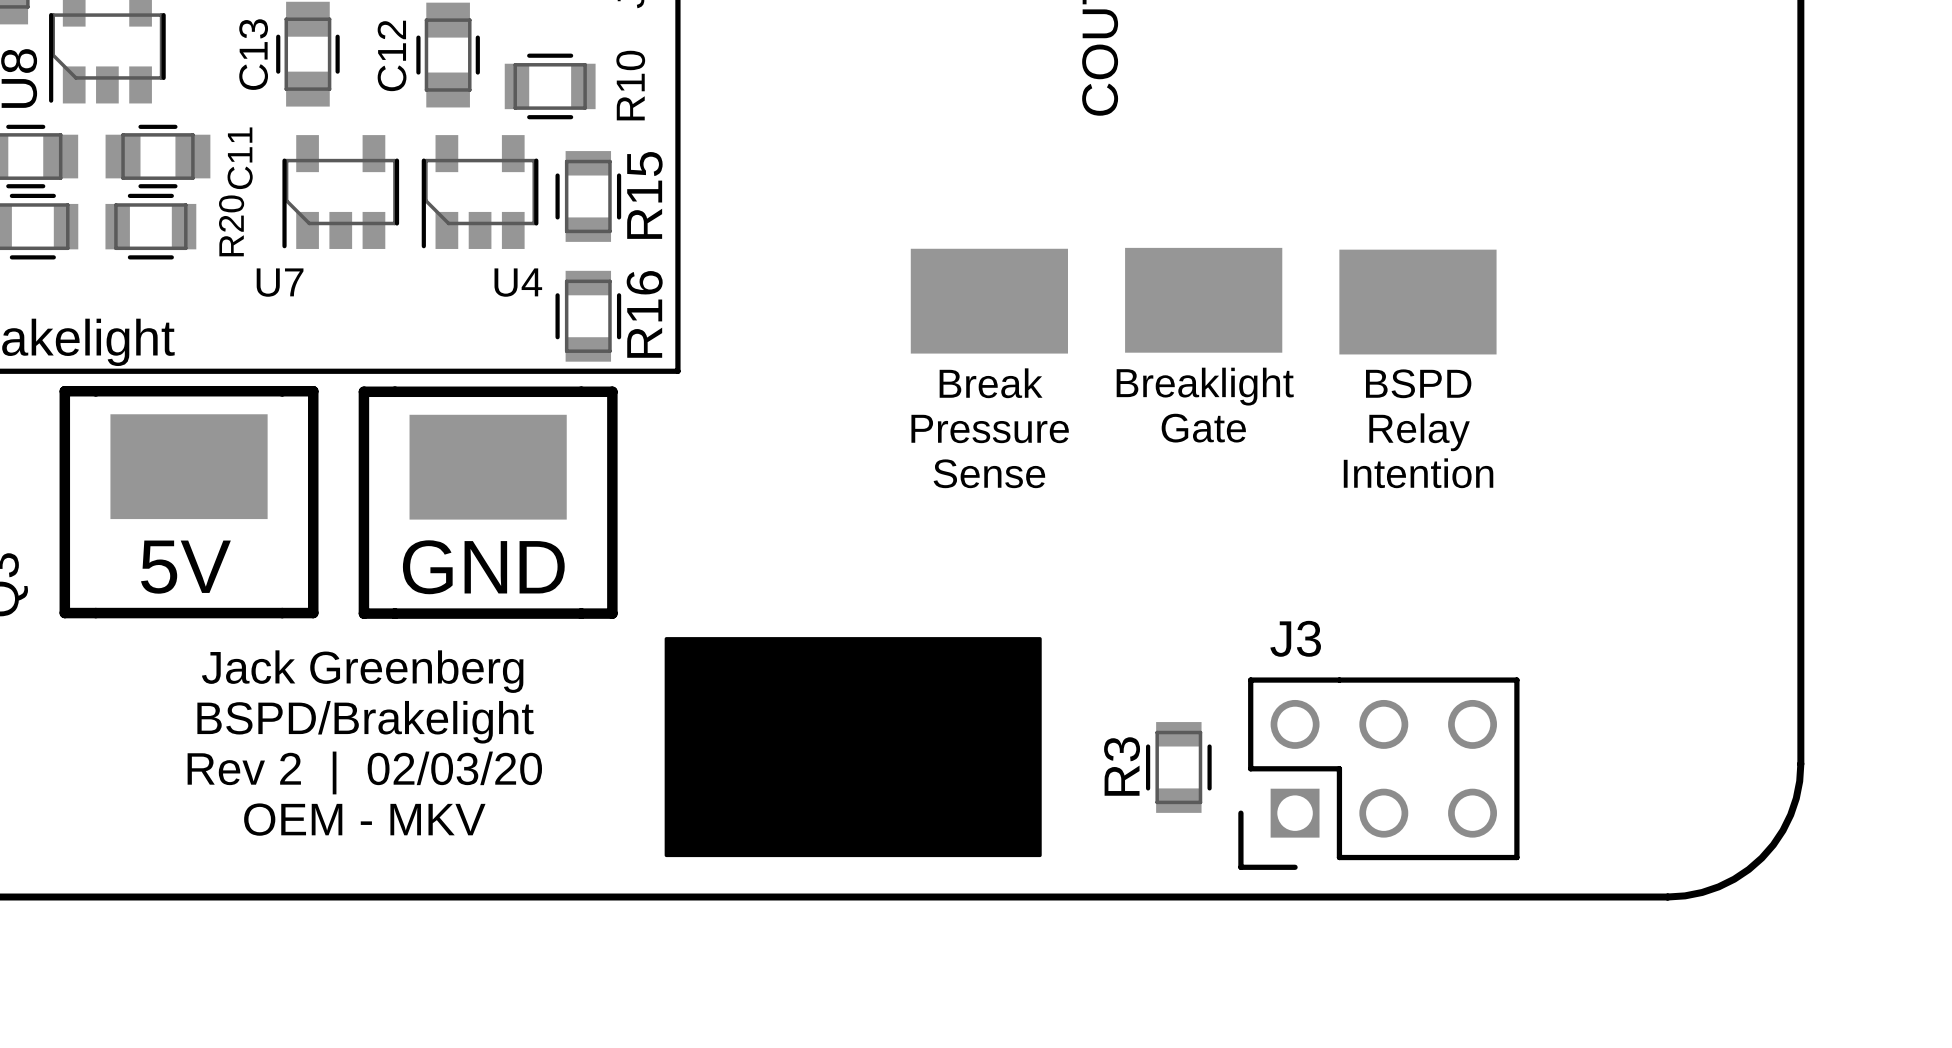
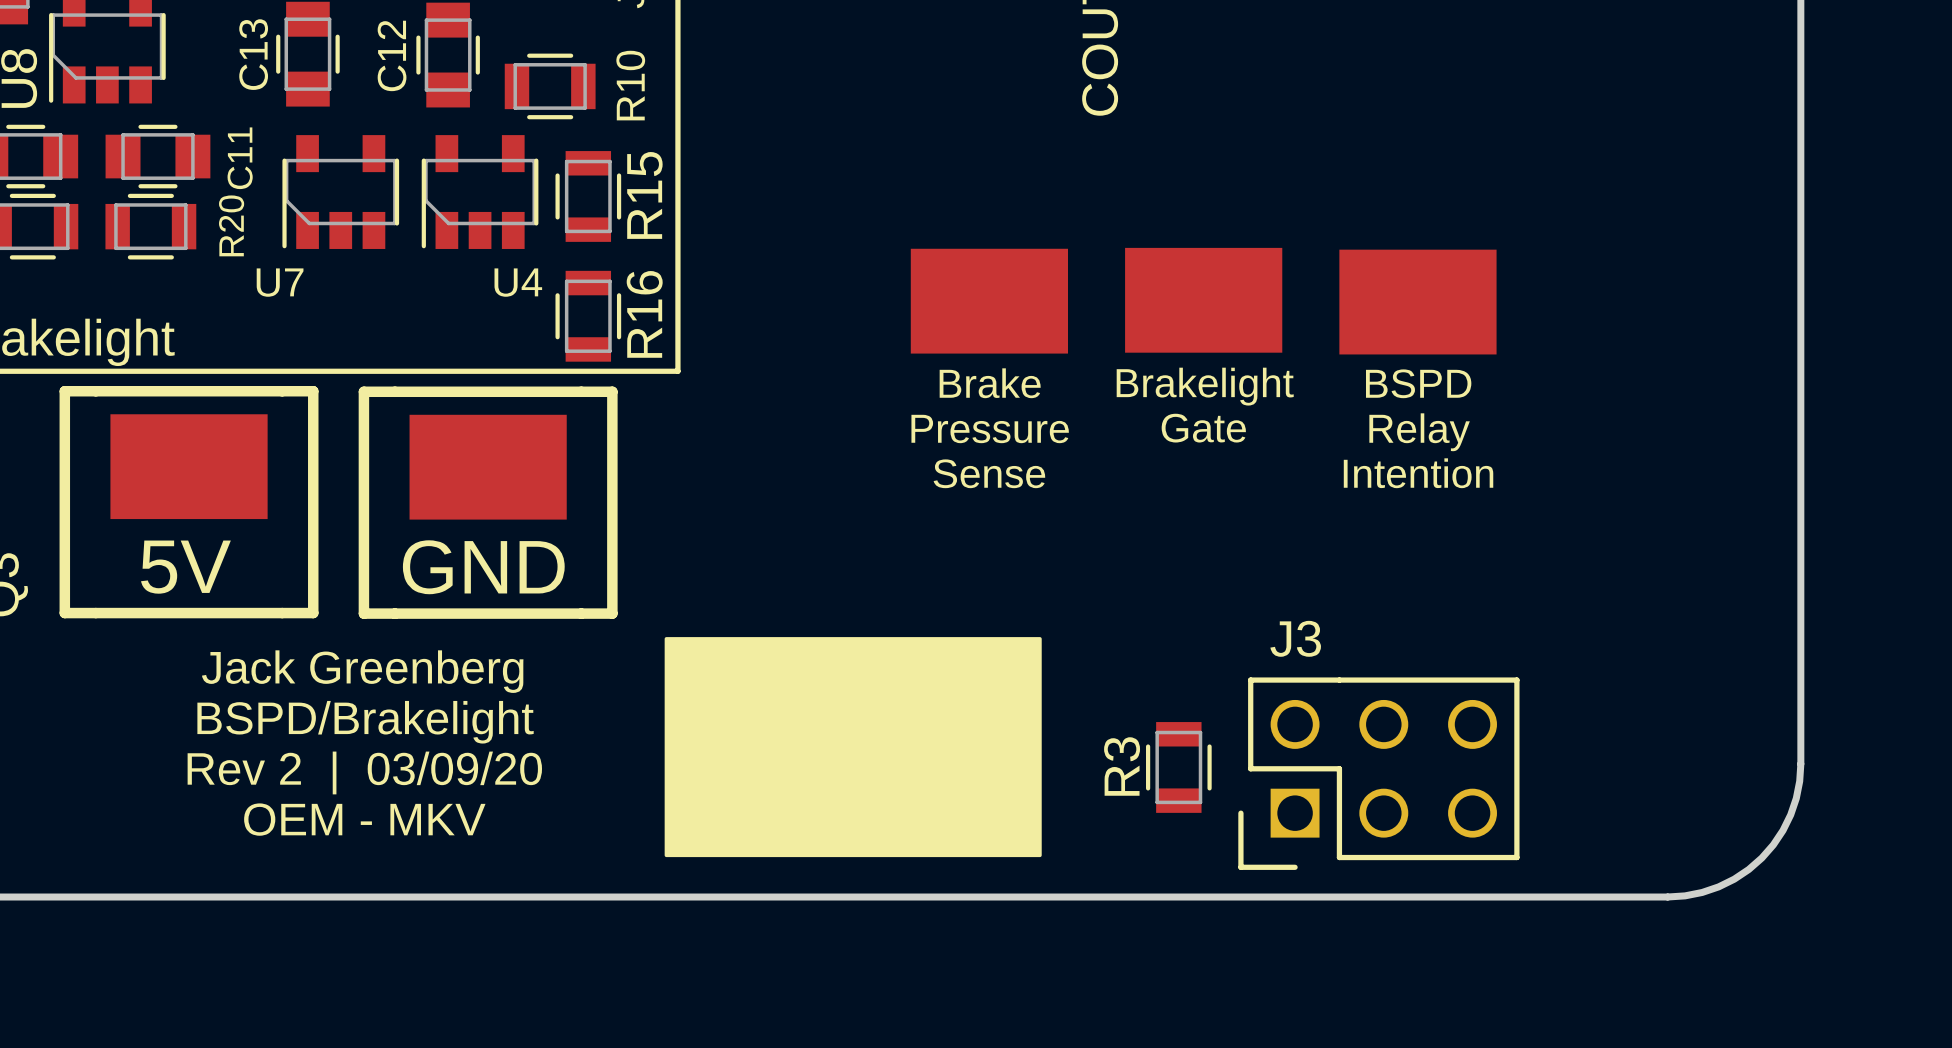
text: Break (991, 383) -> Brake (990, 383)
text: Breaklight (1205, 386) -> Brakelight (1205, 386)
text: Rev 2 | 02/03/20 (364, 772) -> Rev 2 | 03/09/20 (364, 772)

